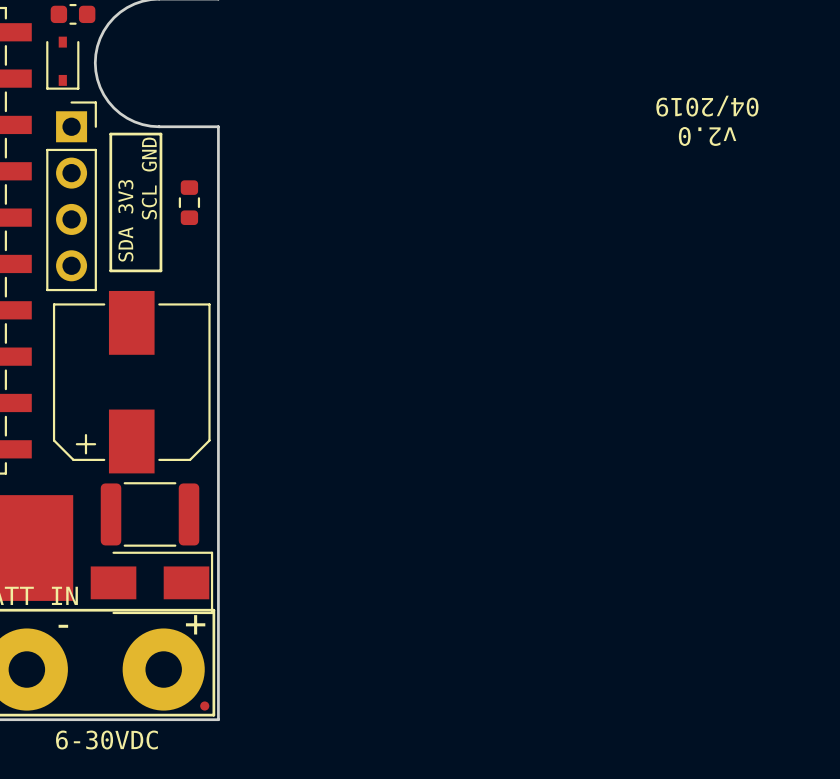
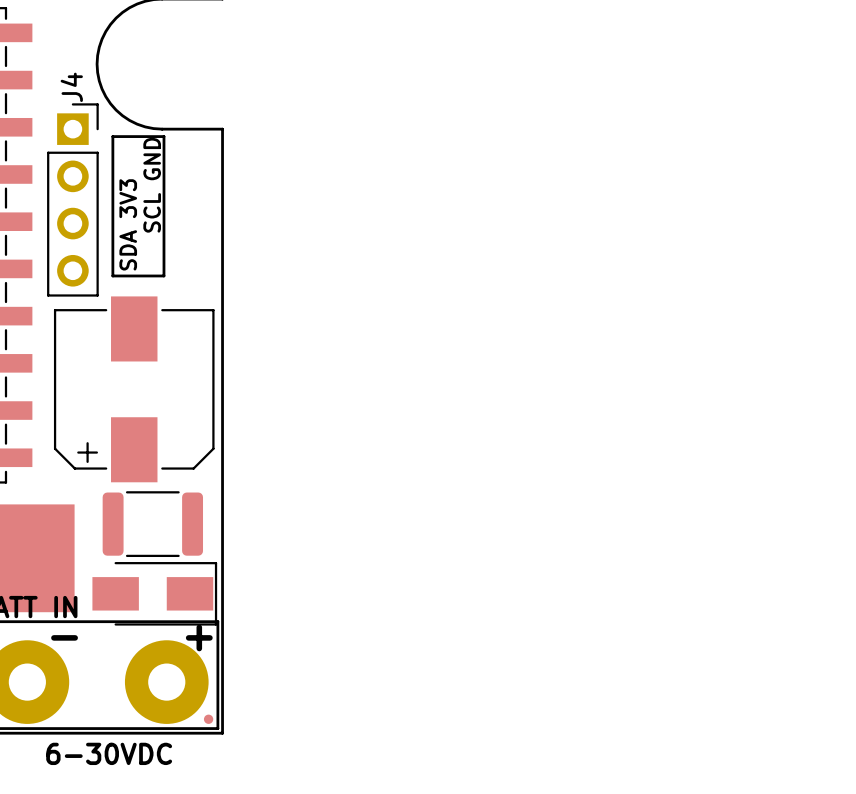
part: (73, 14) -> none
part: (62, 63) -> none
J4 name: none -> J4 (71, 87)
text: 04/2019 (707, 106) -> none
text: v2.0 (707, 136) -> none
part: (189, 202) -> none

